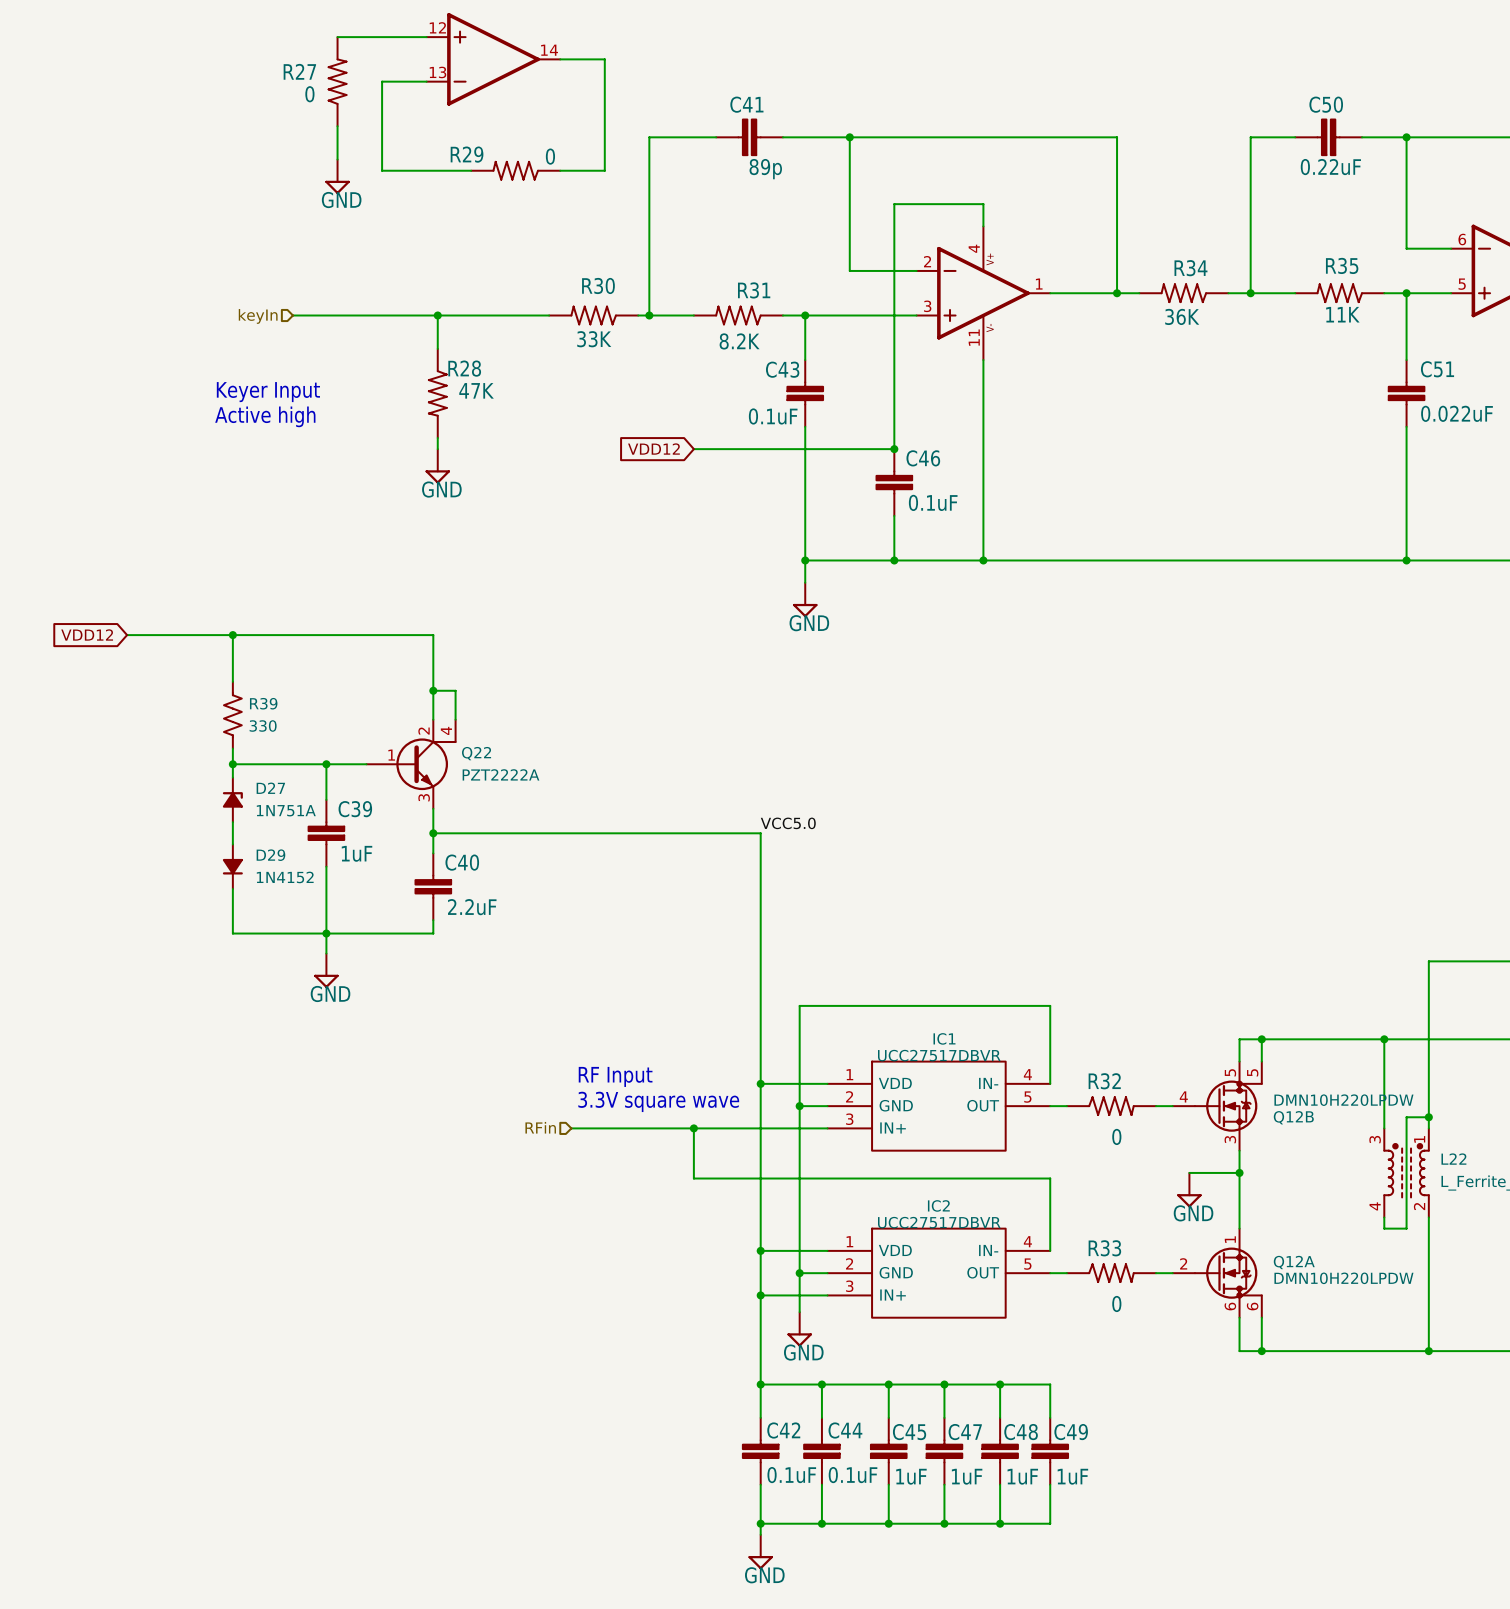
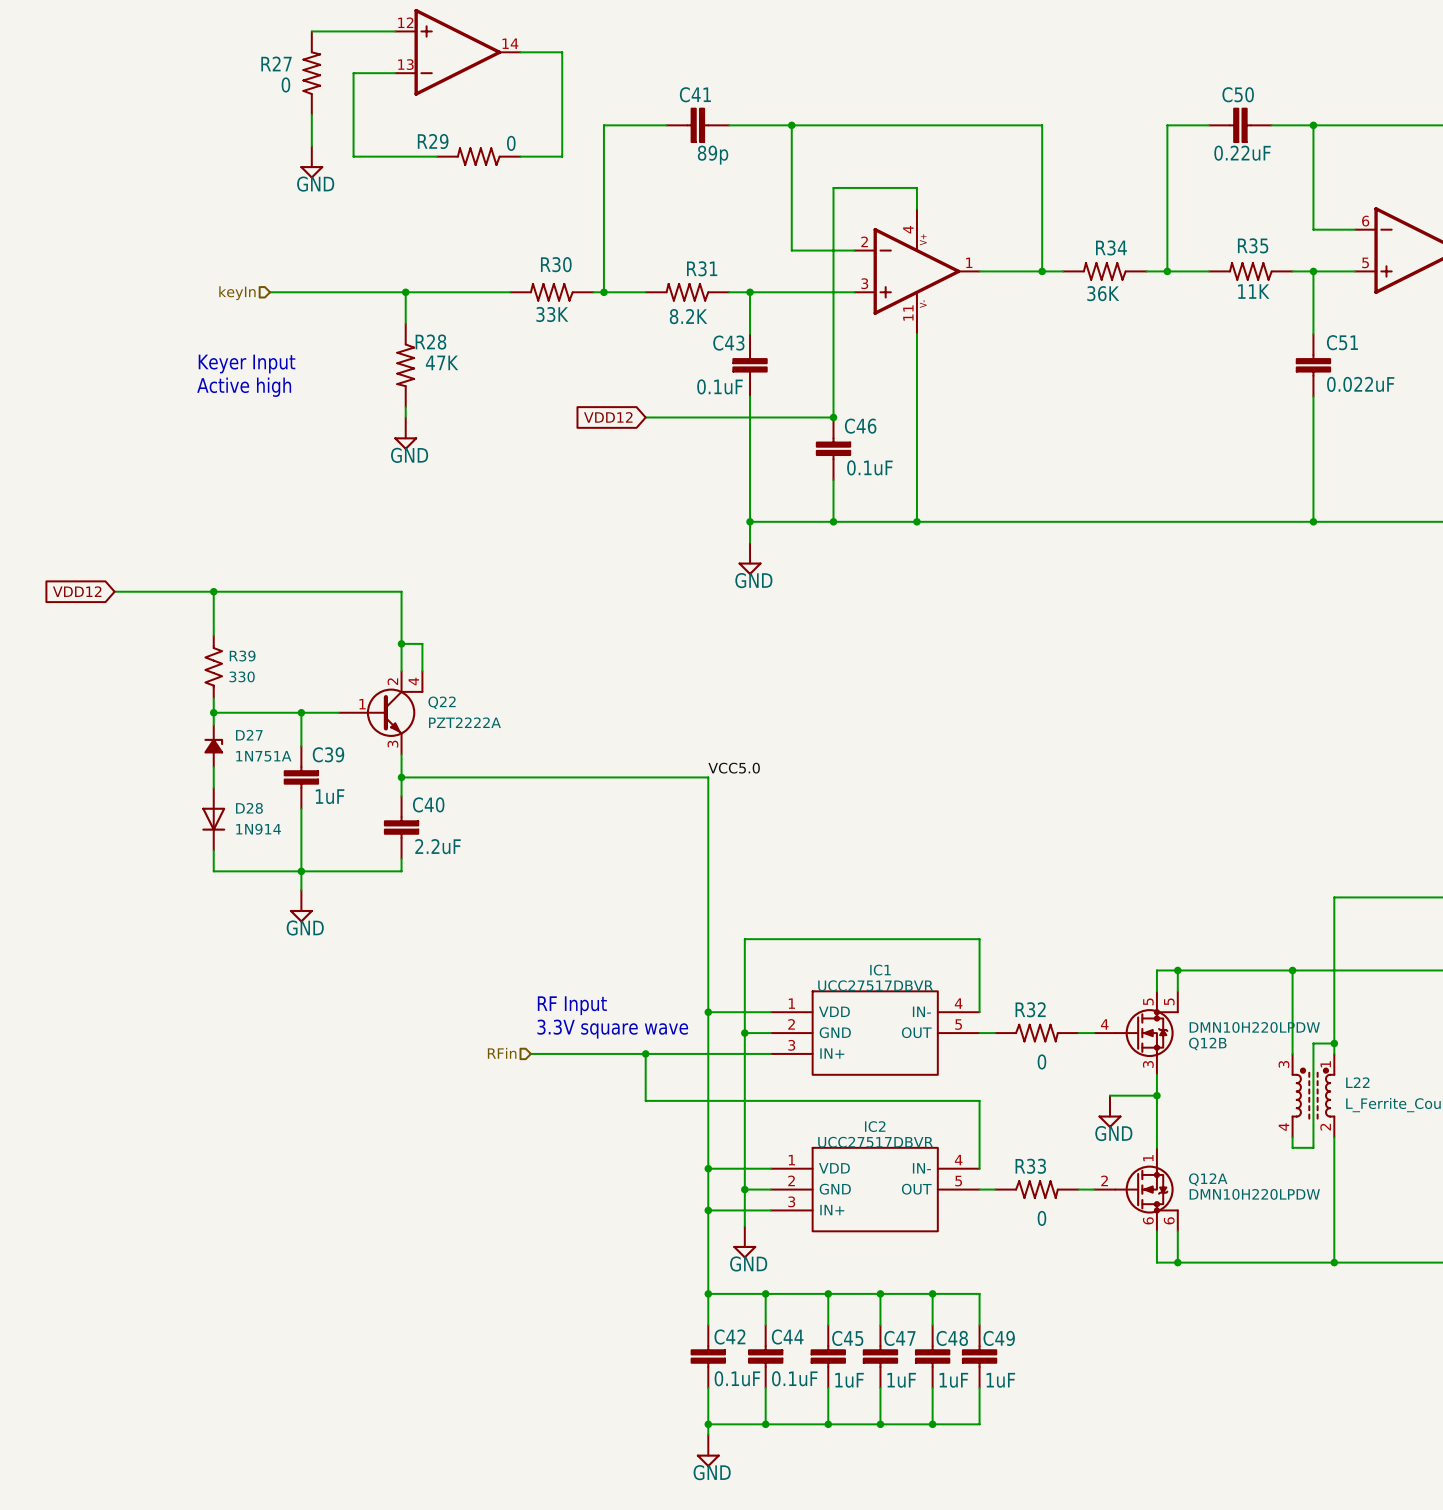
D29: 1N4152 (232, 866) -> none
D28: none -> 1N914 (213, 819)

